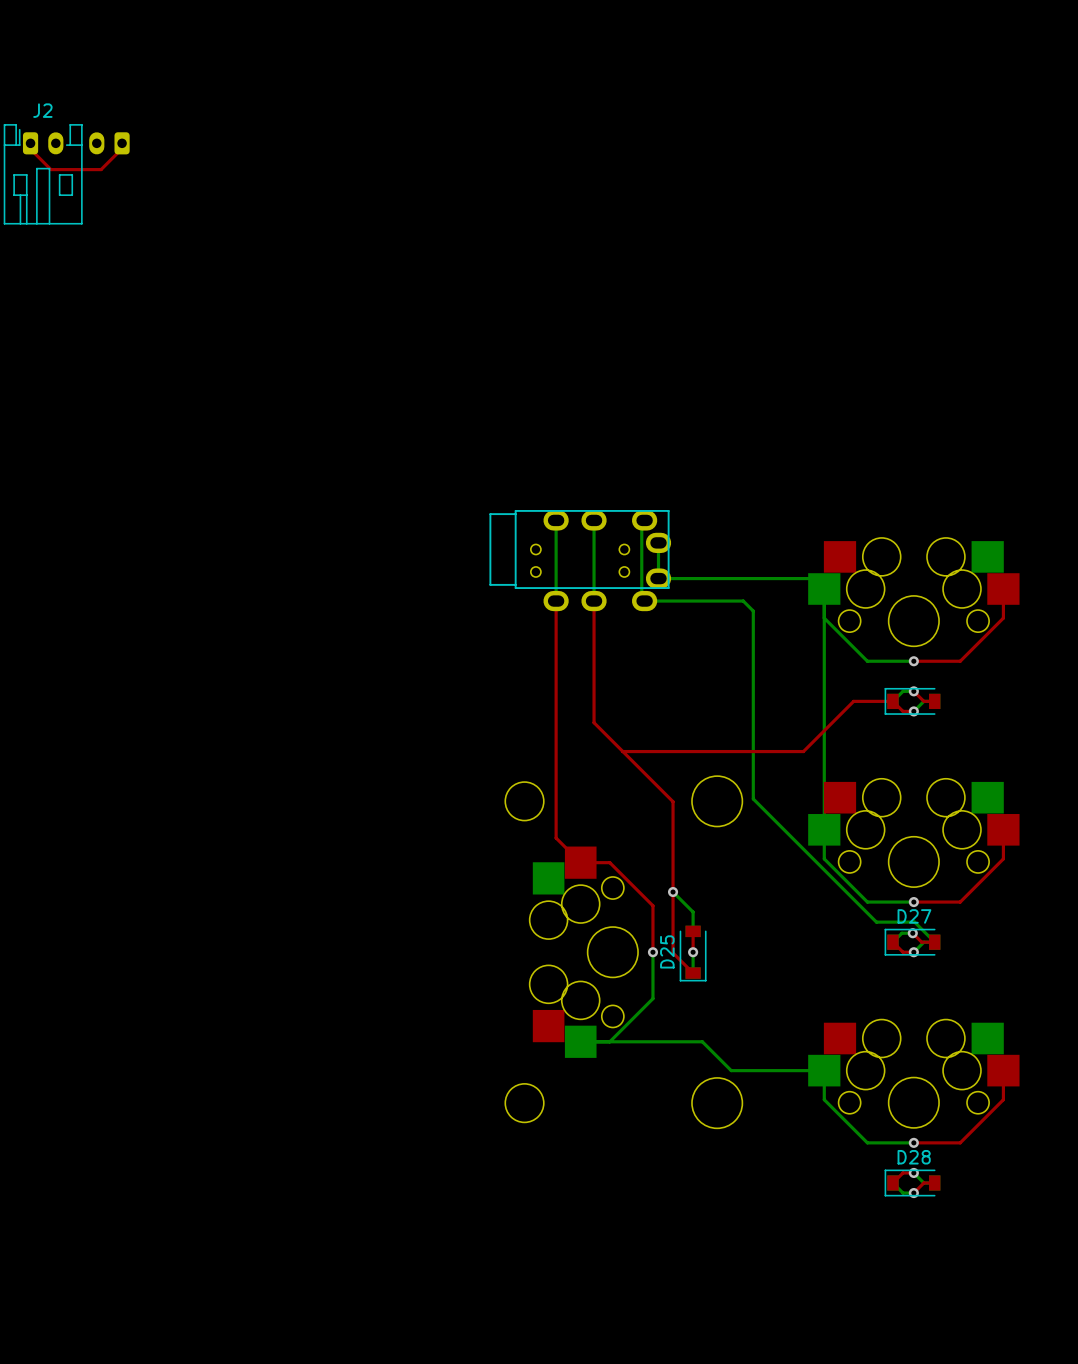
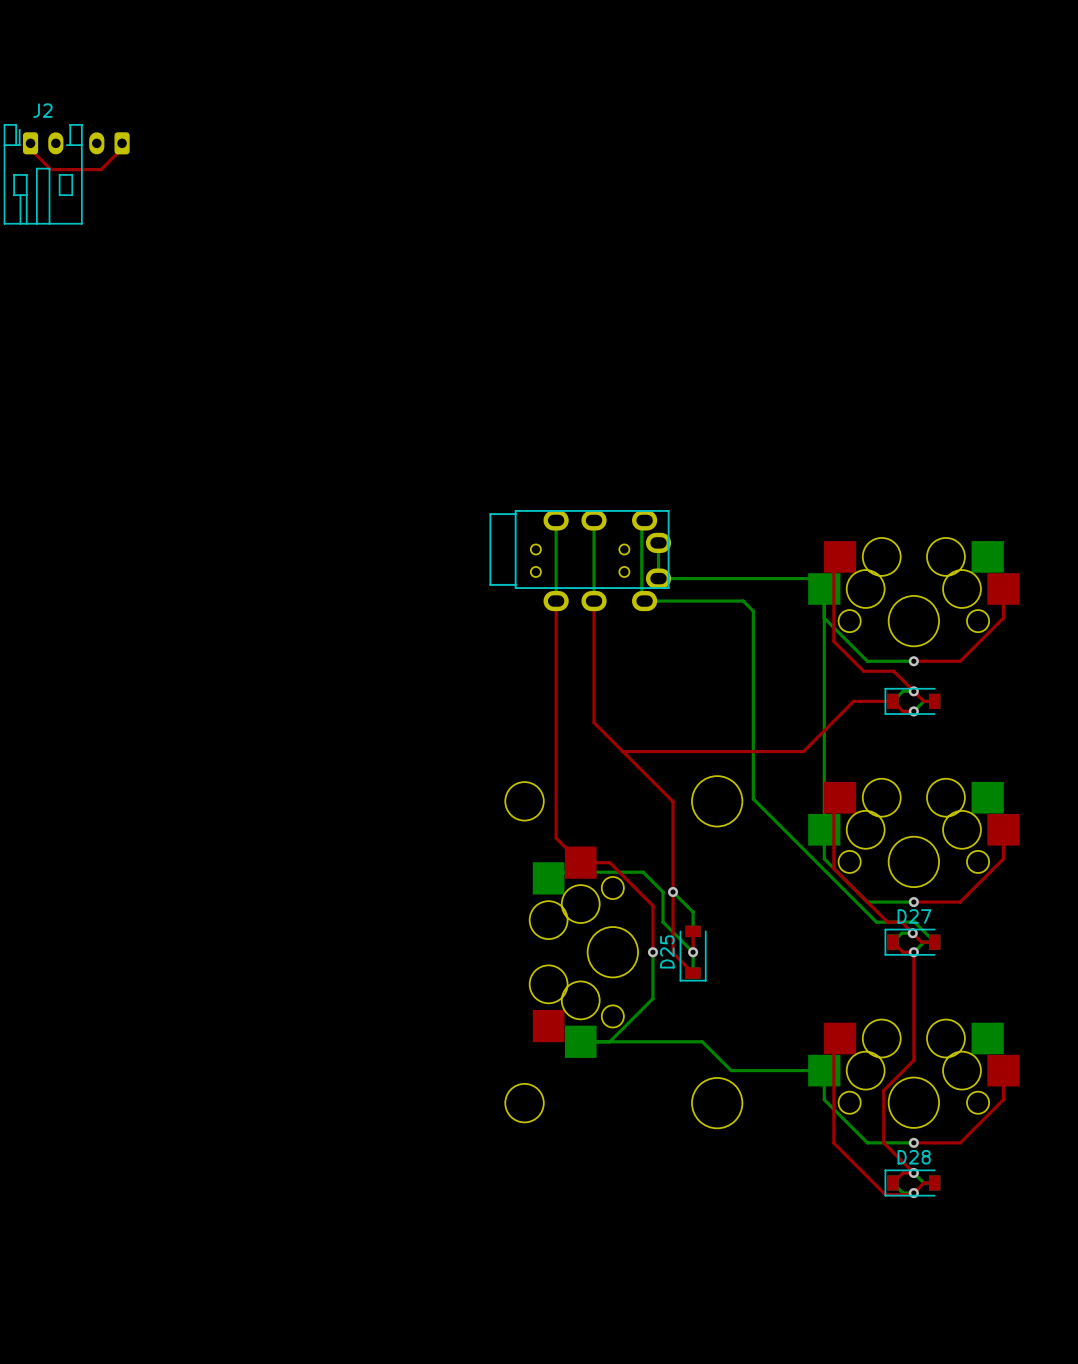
top track: none -> (840, 556) (833, 563) (833, 641) (863, 671) (893, 671) (913, 691)
top track: none -> (840, 797) (833, 803) (833, 868) (887, 922) (901, 922) (912, 933)
bottom track: none -> (548, 878) (554, 872) (643, 872) (663, 892) (663, 922) (693, 952)
top track: none -> (913, 952) (913, 1060) (883, 1090) (883, 1142) (913, 1172)
top track: none -> (840, 1038) (833, 1044) (833, 1143) (885, 1194) (912, 1194) (913, 1193)

